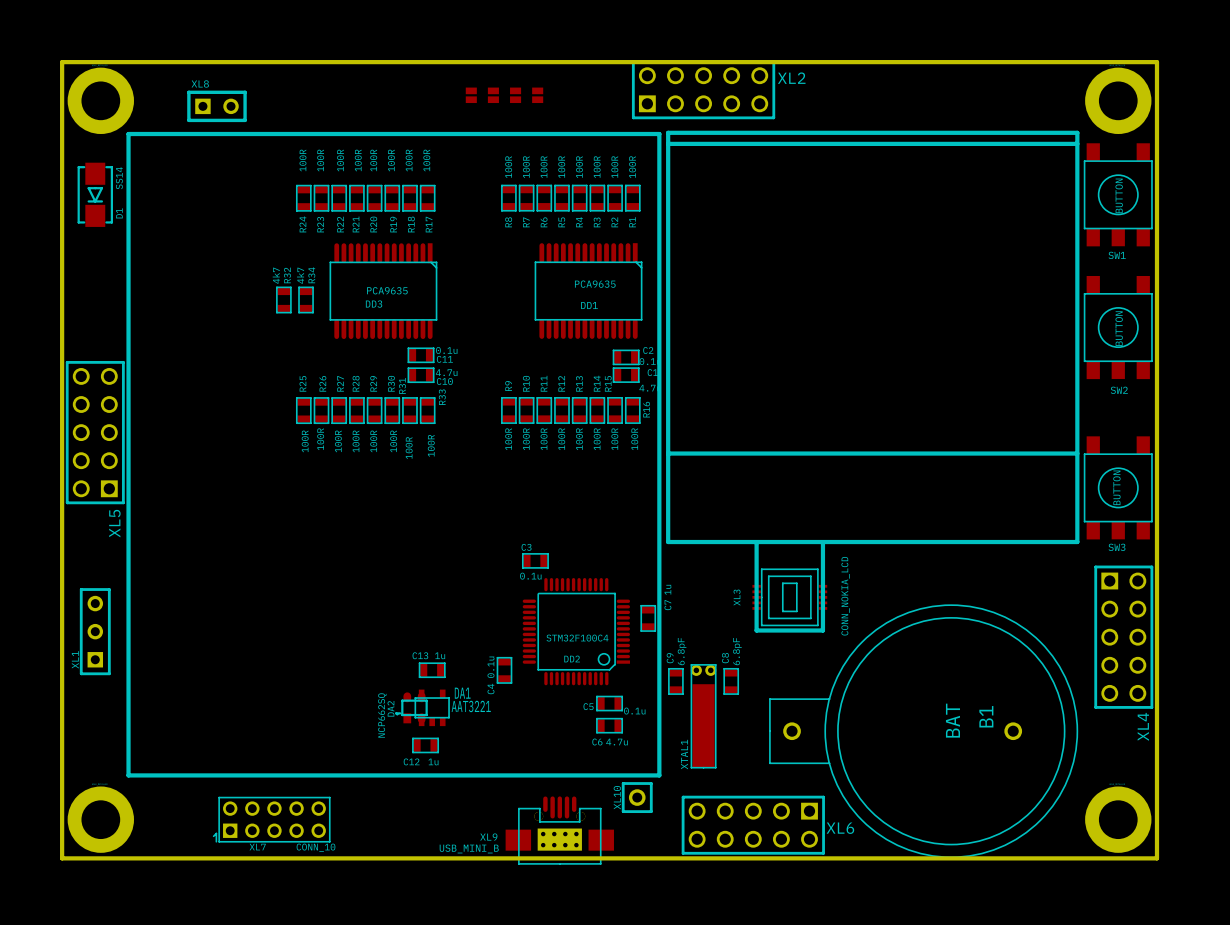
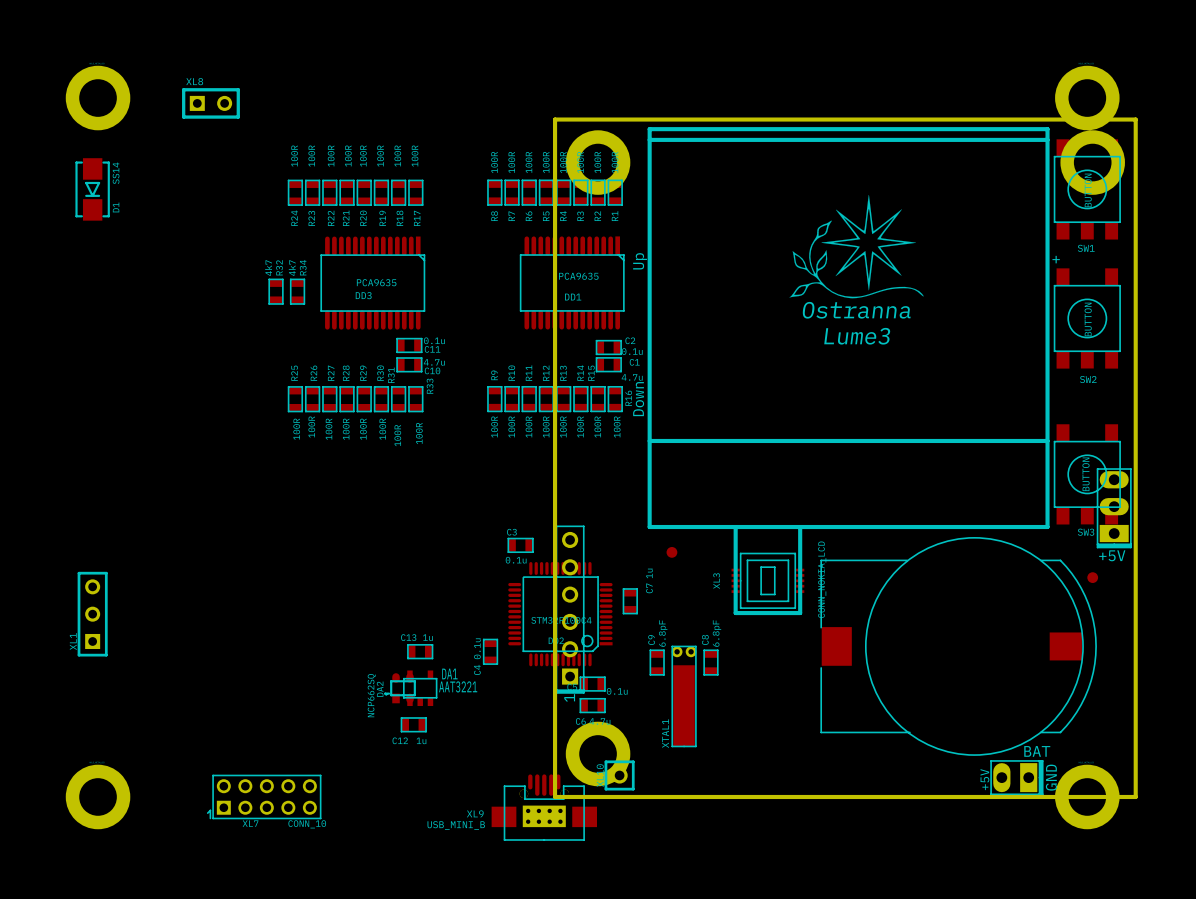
board edge: (62, 62) (1156, 62) (1156, 858) (62, 858) (62, 62) -> none
XL2: (703, 89) -> none
part: (471, 95) -> none
part: (493, 95) -> none
part: (515, 95) -> none
part: (537, 95) -> none
board edge: none -> (555, 119) (1135, 119) (1135, 796) (555, 796) (555, 119)
line: (128, 134) (128, 775) (659, 775) (659, 134) (128, 134) -> none
part: none -> (598, 162)
part: none -> (1092, 162)
drawing: none -> [789, 194, 924, 299]
text: none -> + (1056, 259)
text: none -> Up (640, 261)
text: none -> Ostranna (856, 310)
text: none -> Lume3 (857, 336)
text: none -> Down (638, 399)
XL5: (95, 432) -> none
part: none -> (1114, 508)
part: none -> (671, 552)
text: none -> +5V (1112, 555)
part: none -> (1092, 577)
part: none -> (570, 609)
XL4: (1123, 637) -> none
part: none -> (958, 646)
B1: BAT (923, 731) -> none
text: none -> BAT (1037, 751)
part: none -> (598, 753)
part: none -> (1016, 777)
text: none -> GND (1051, 777)
text: none -> +5V (984, 779)
XL6: (753, 825) -> none

